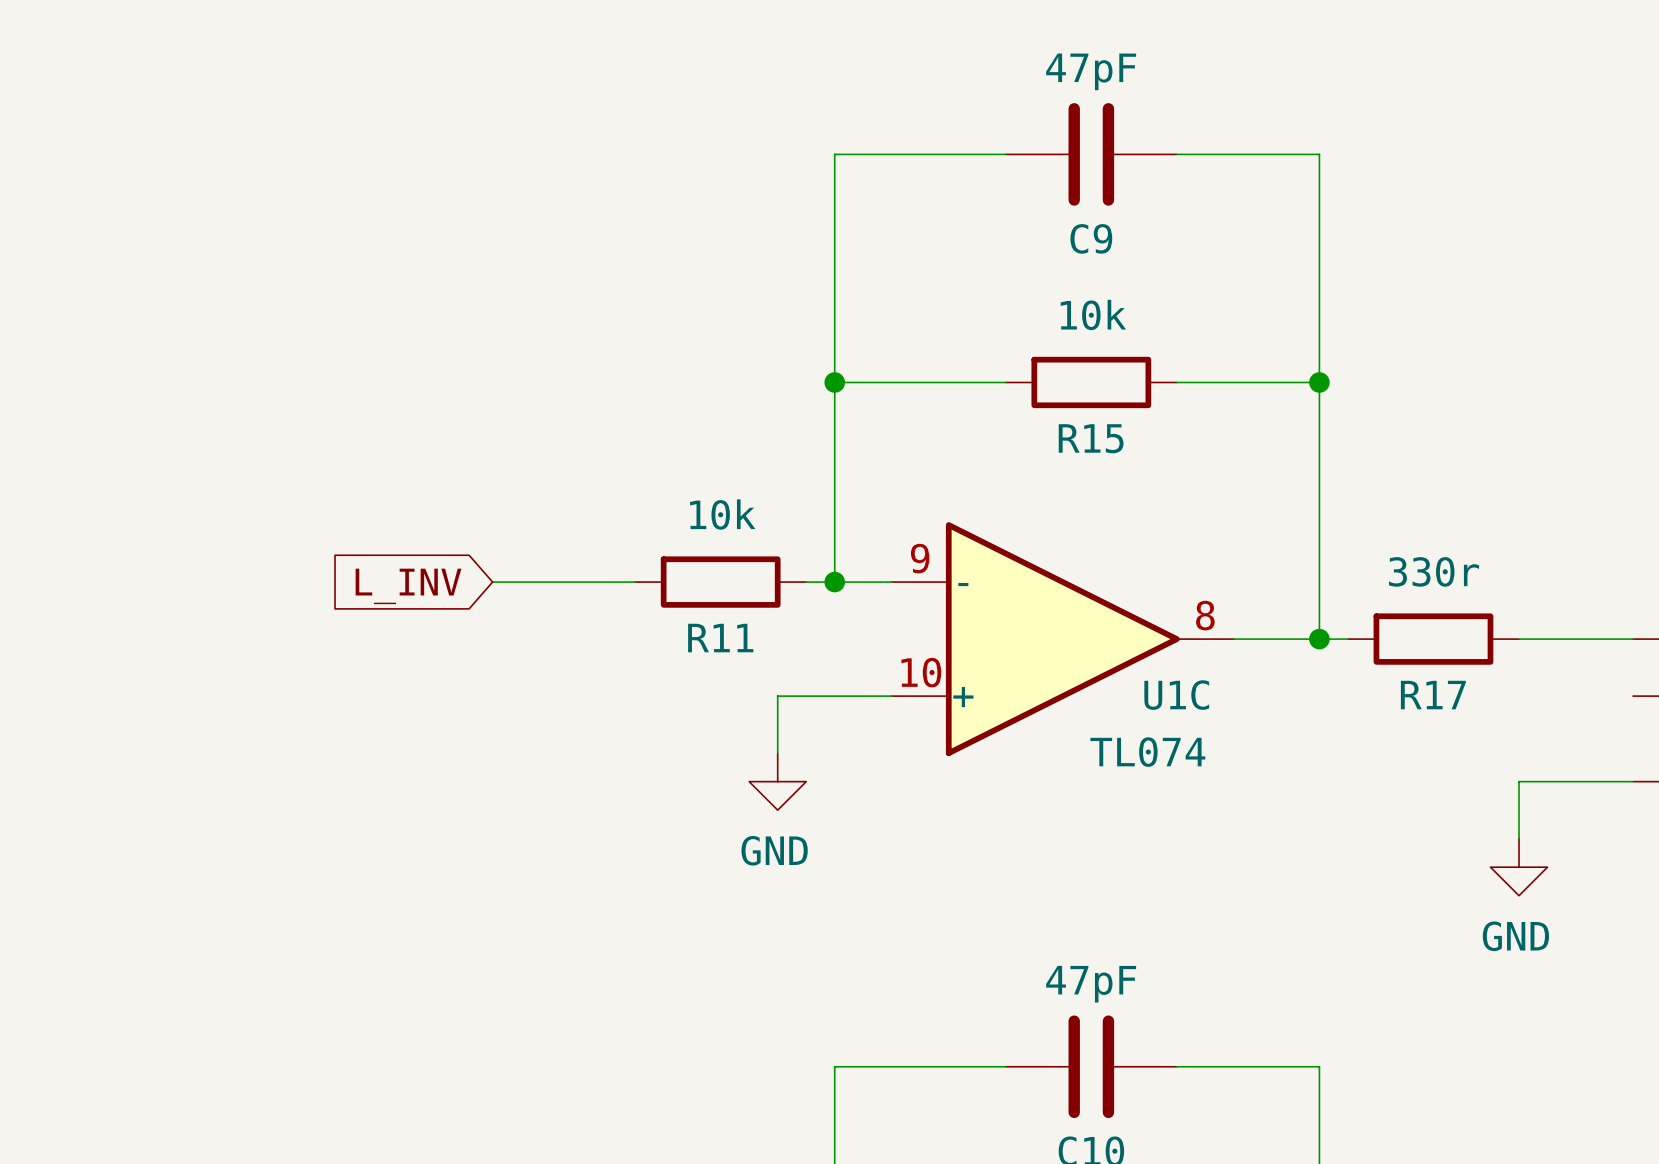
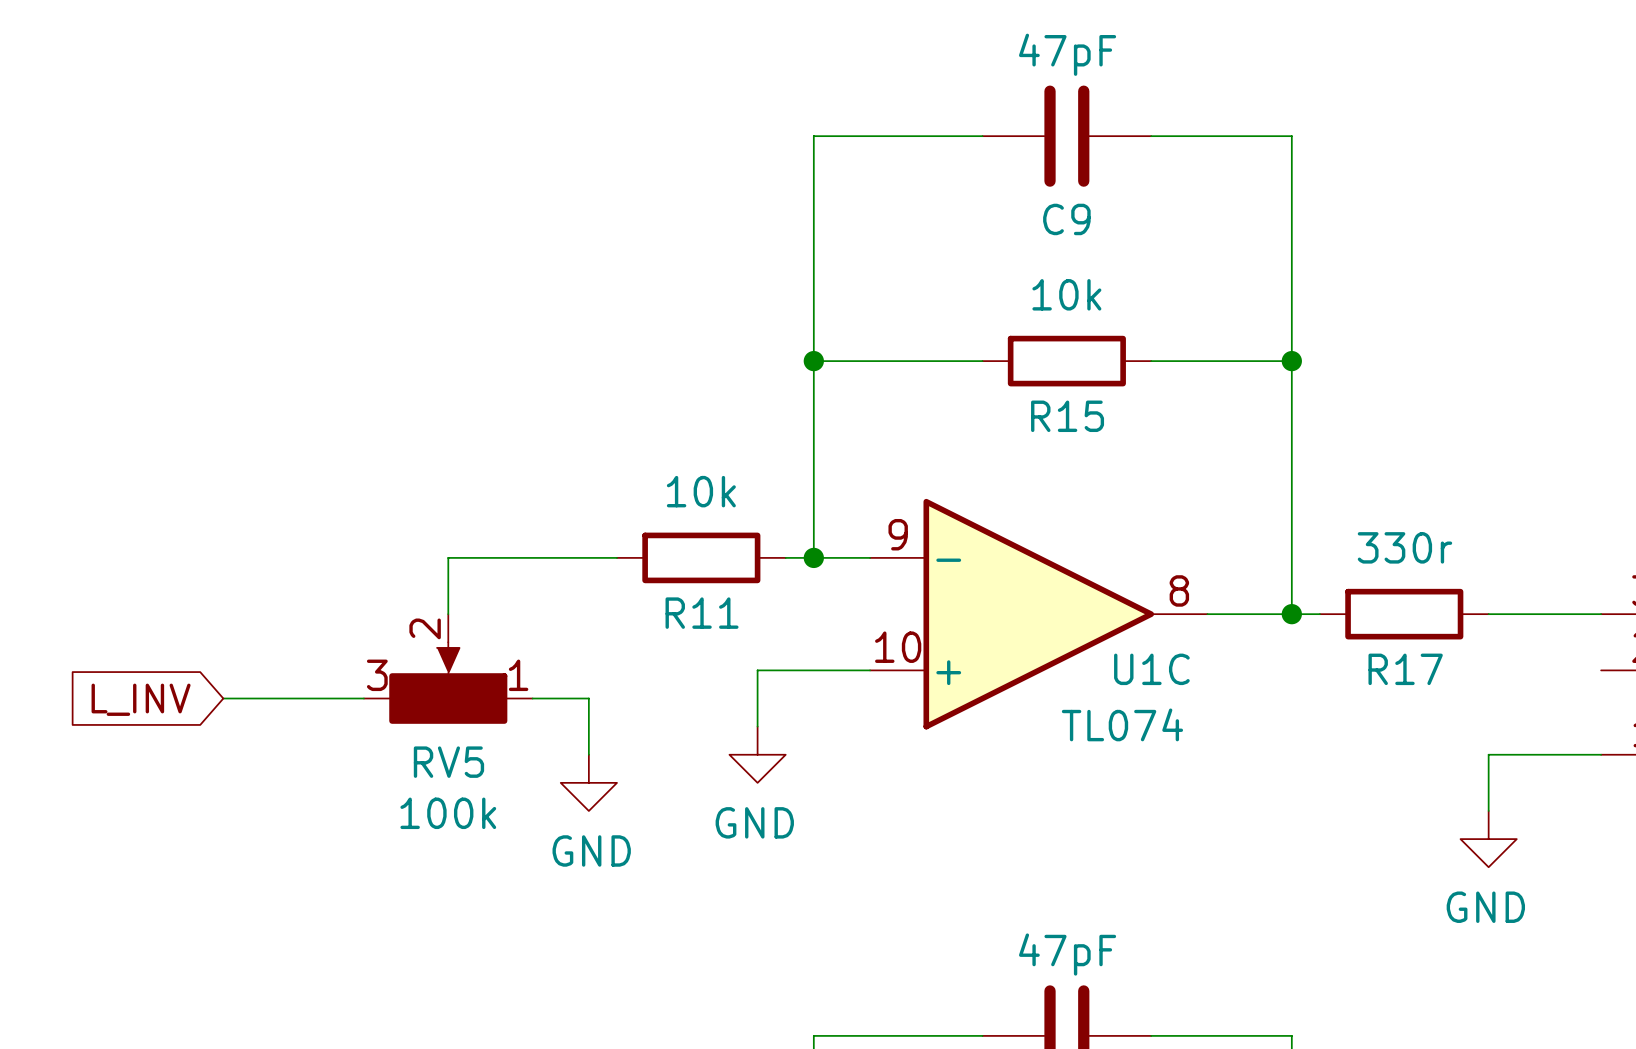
wire: none -> (476, 557) (448, 557) (448, 614)
global label position: L_INV (408, 586) -> L_INV (141, 699)
RV5: none -> 100k (448, 668)
wire: none -> (223, 698) (363, 698)
wire: none -> (532, 698) (588, 698) (588, 754)
power symbol: none -> GND (588, 782)

